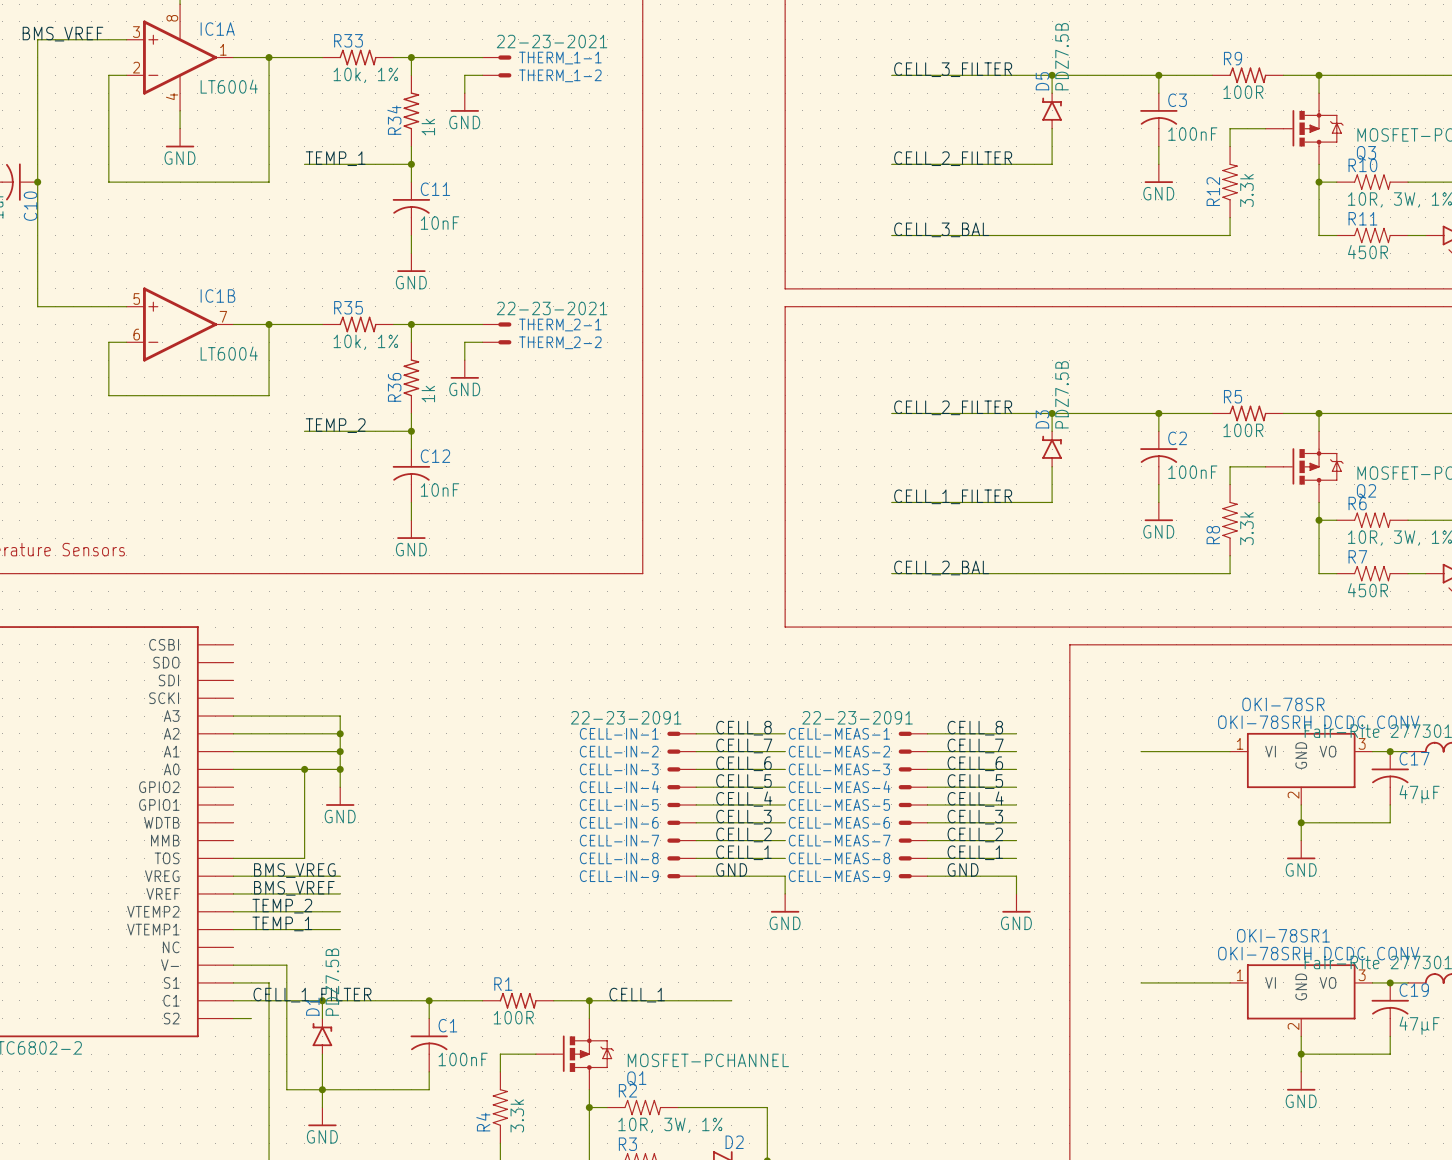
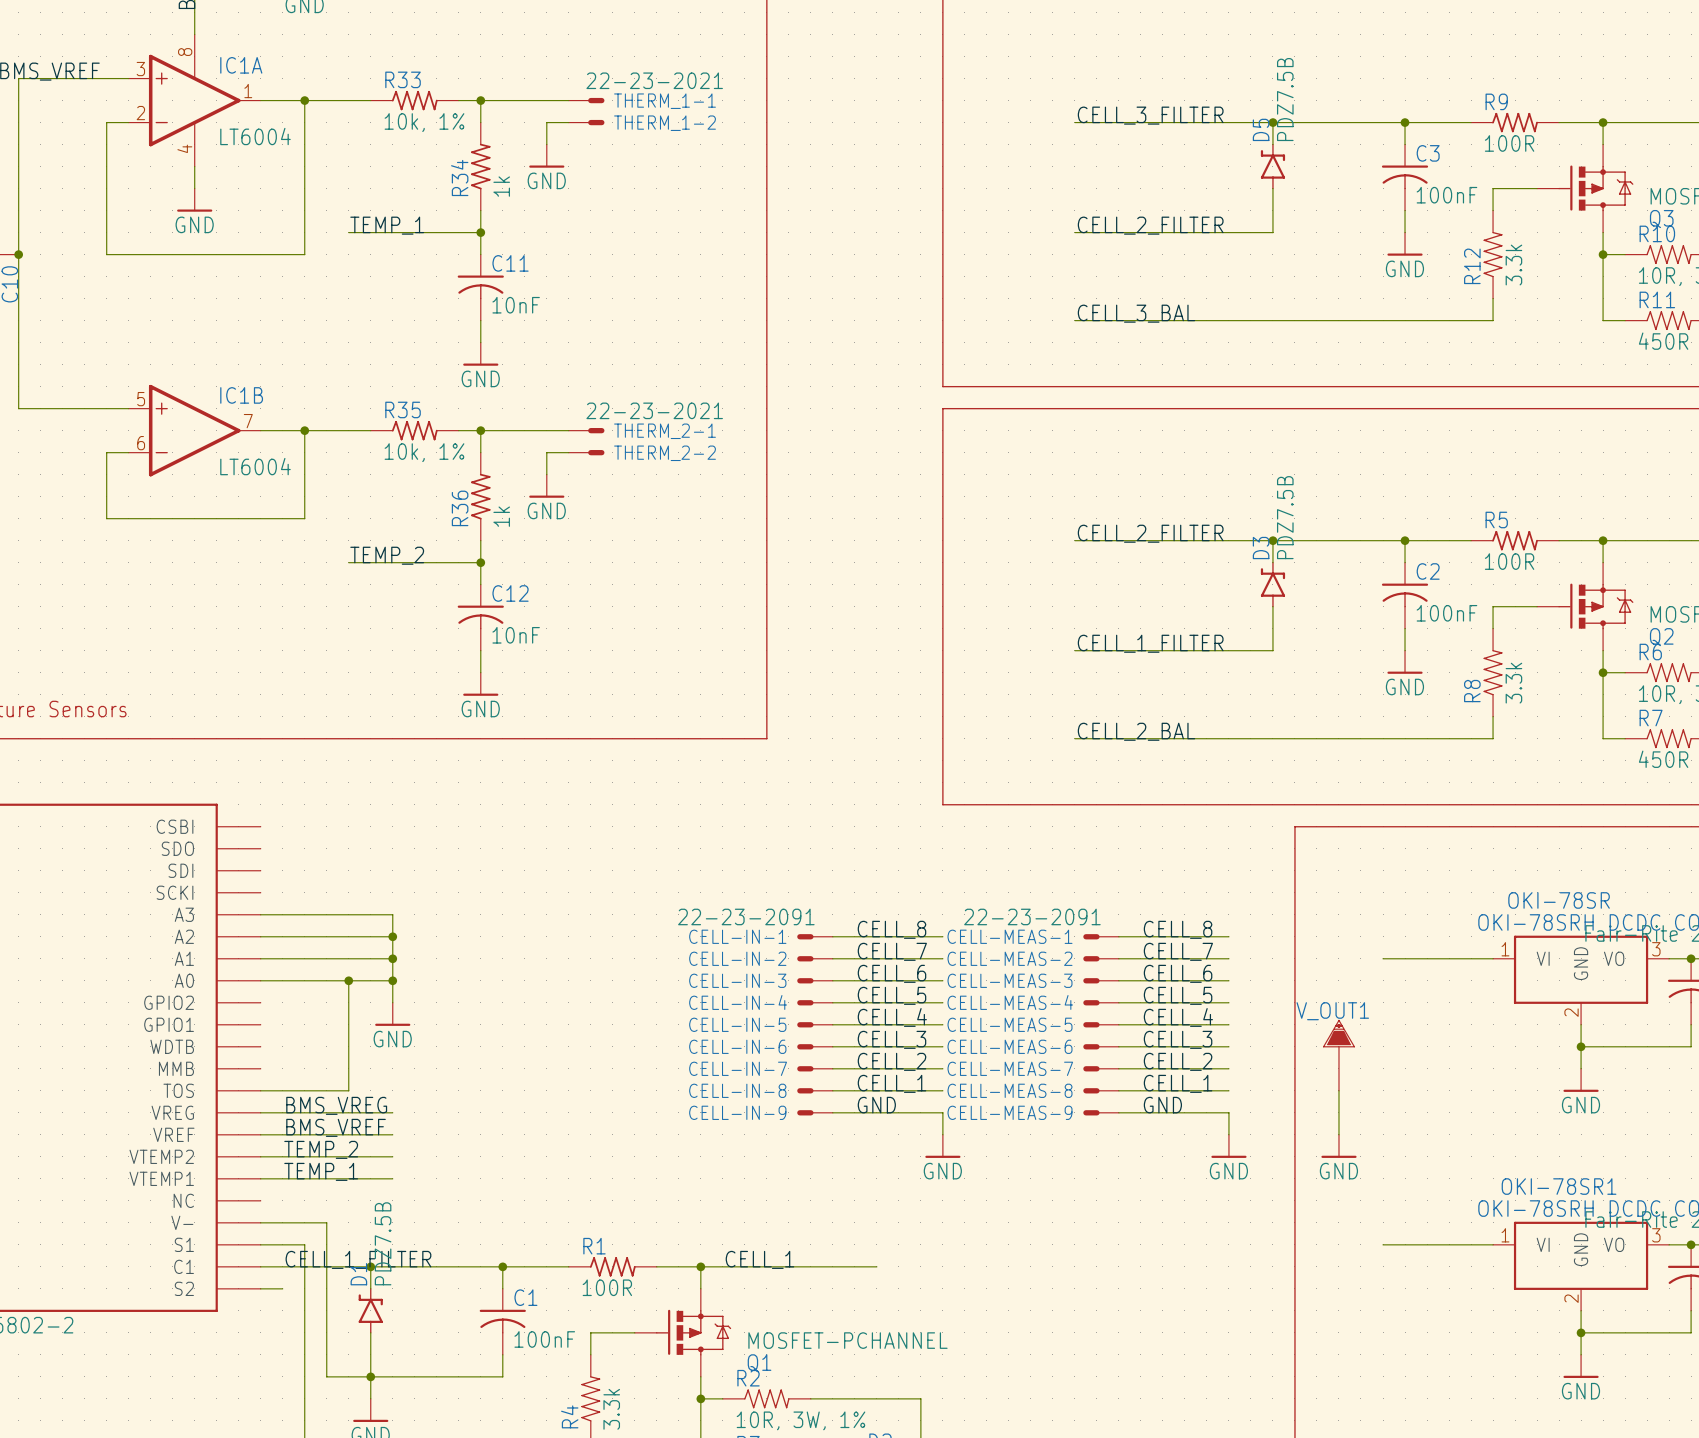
V_OUT1: none -> (1338, 1055)
wire: none -> (1338, 1090) (1338, 1134)
power symbol: none -> GND (1338, 1146)

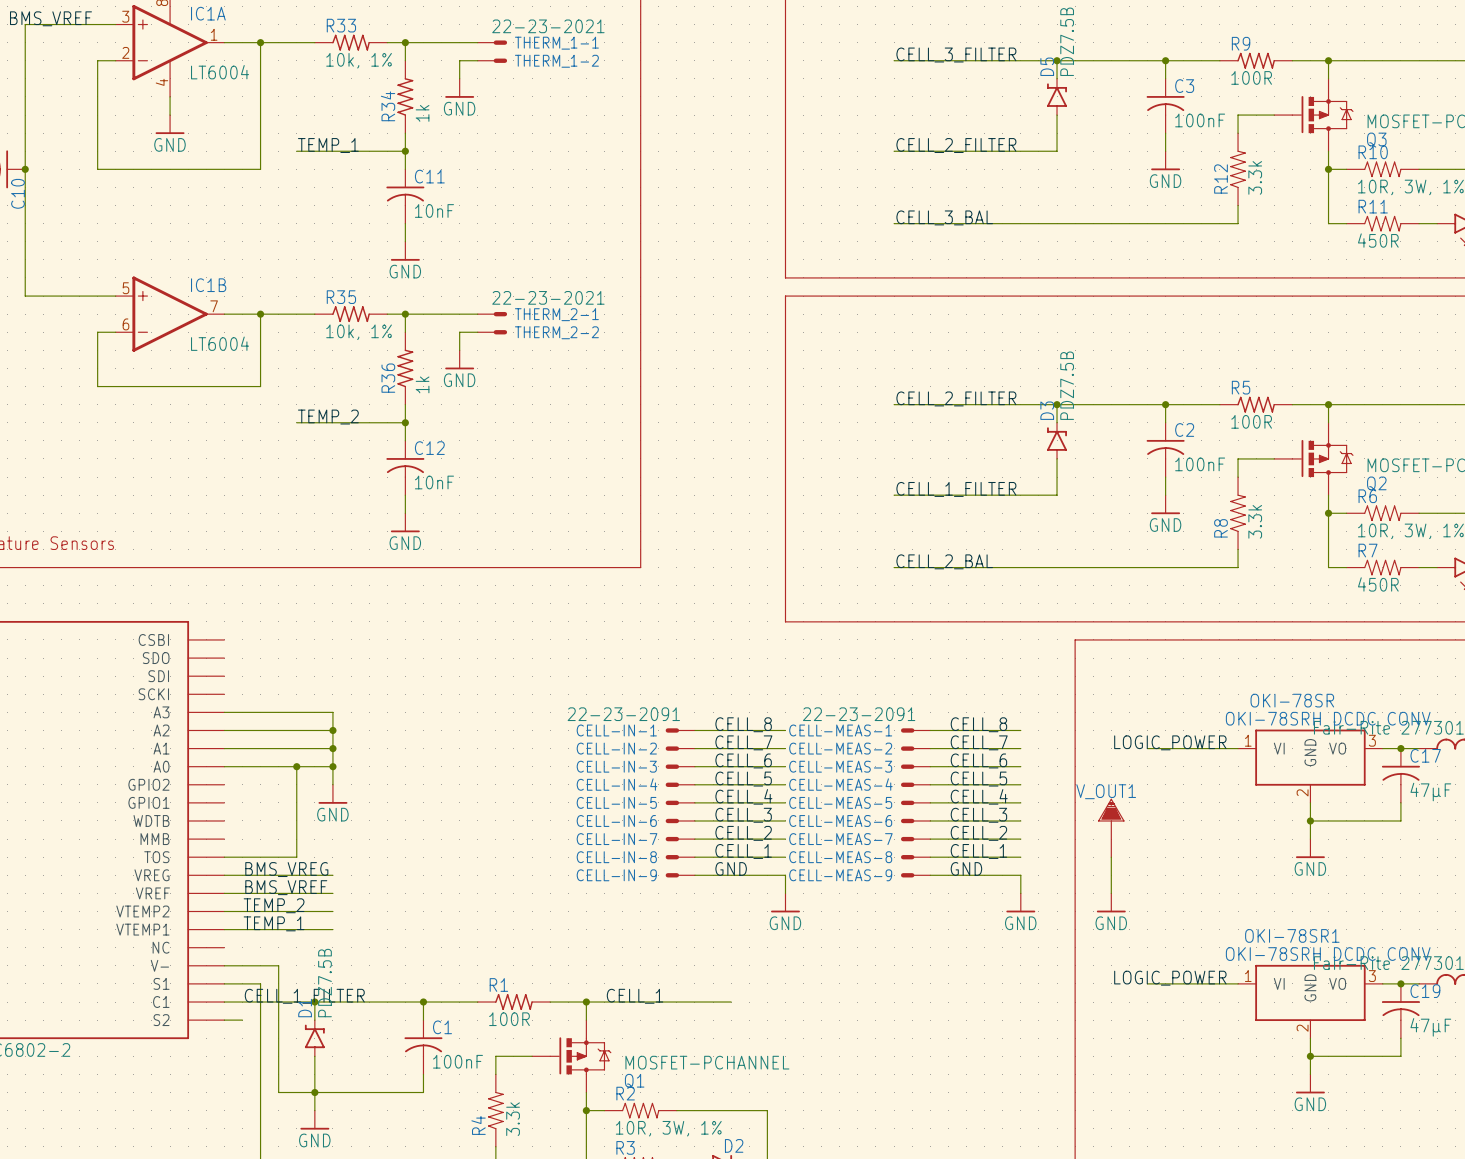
label: none -> LOGIC_POWER (1170, 742)
label: none -> LOGIC_POWER (1170, 978)

